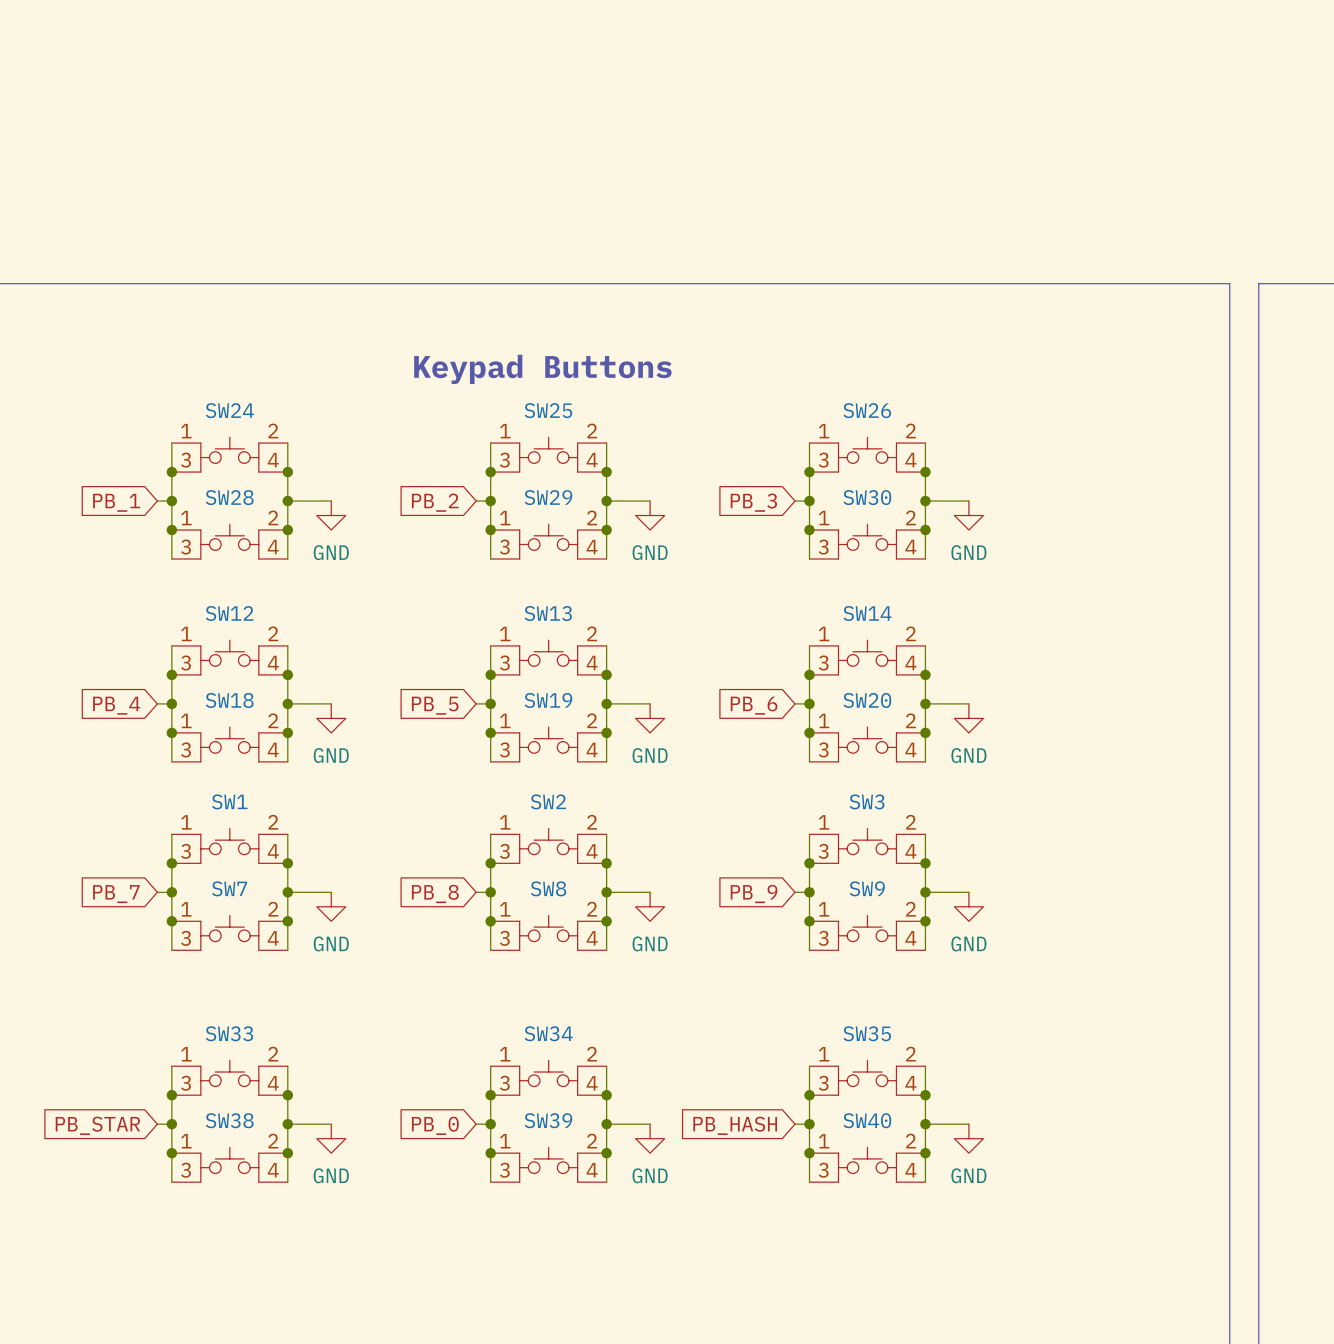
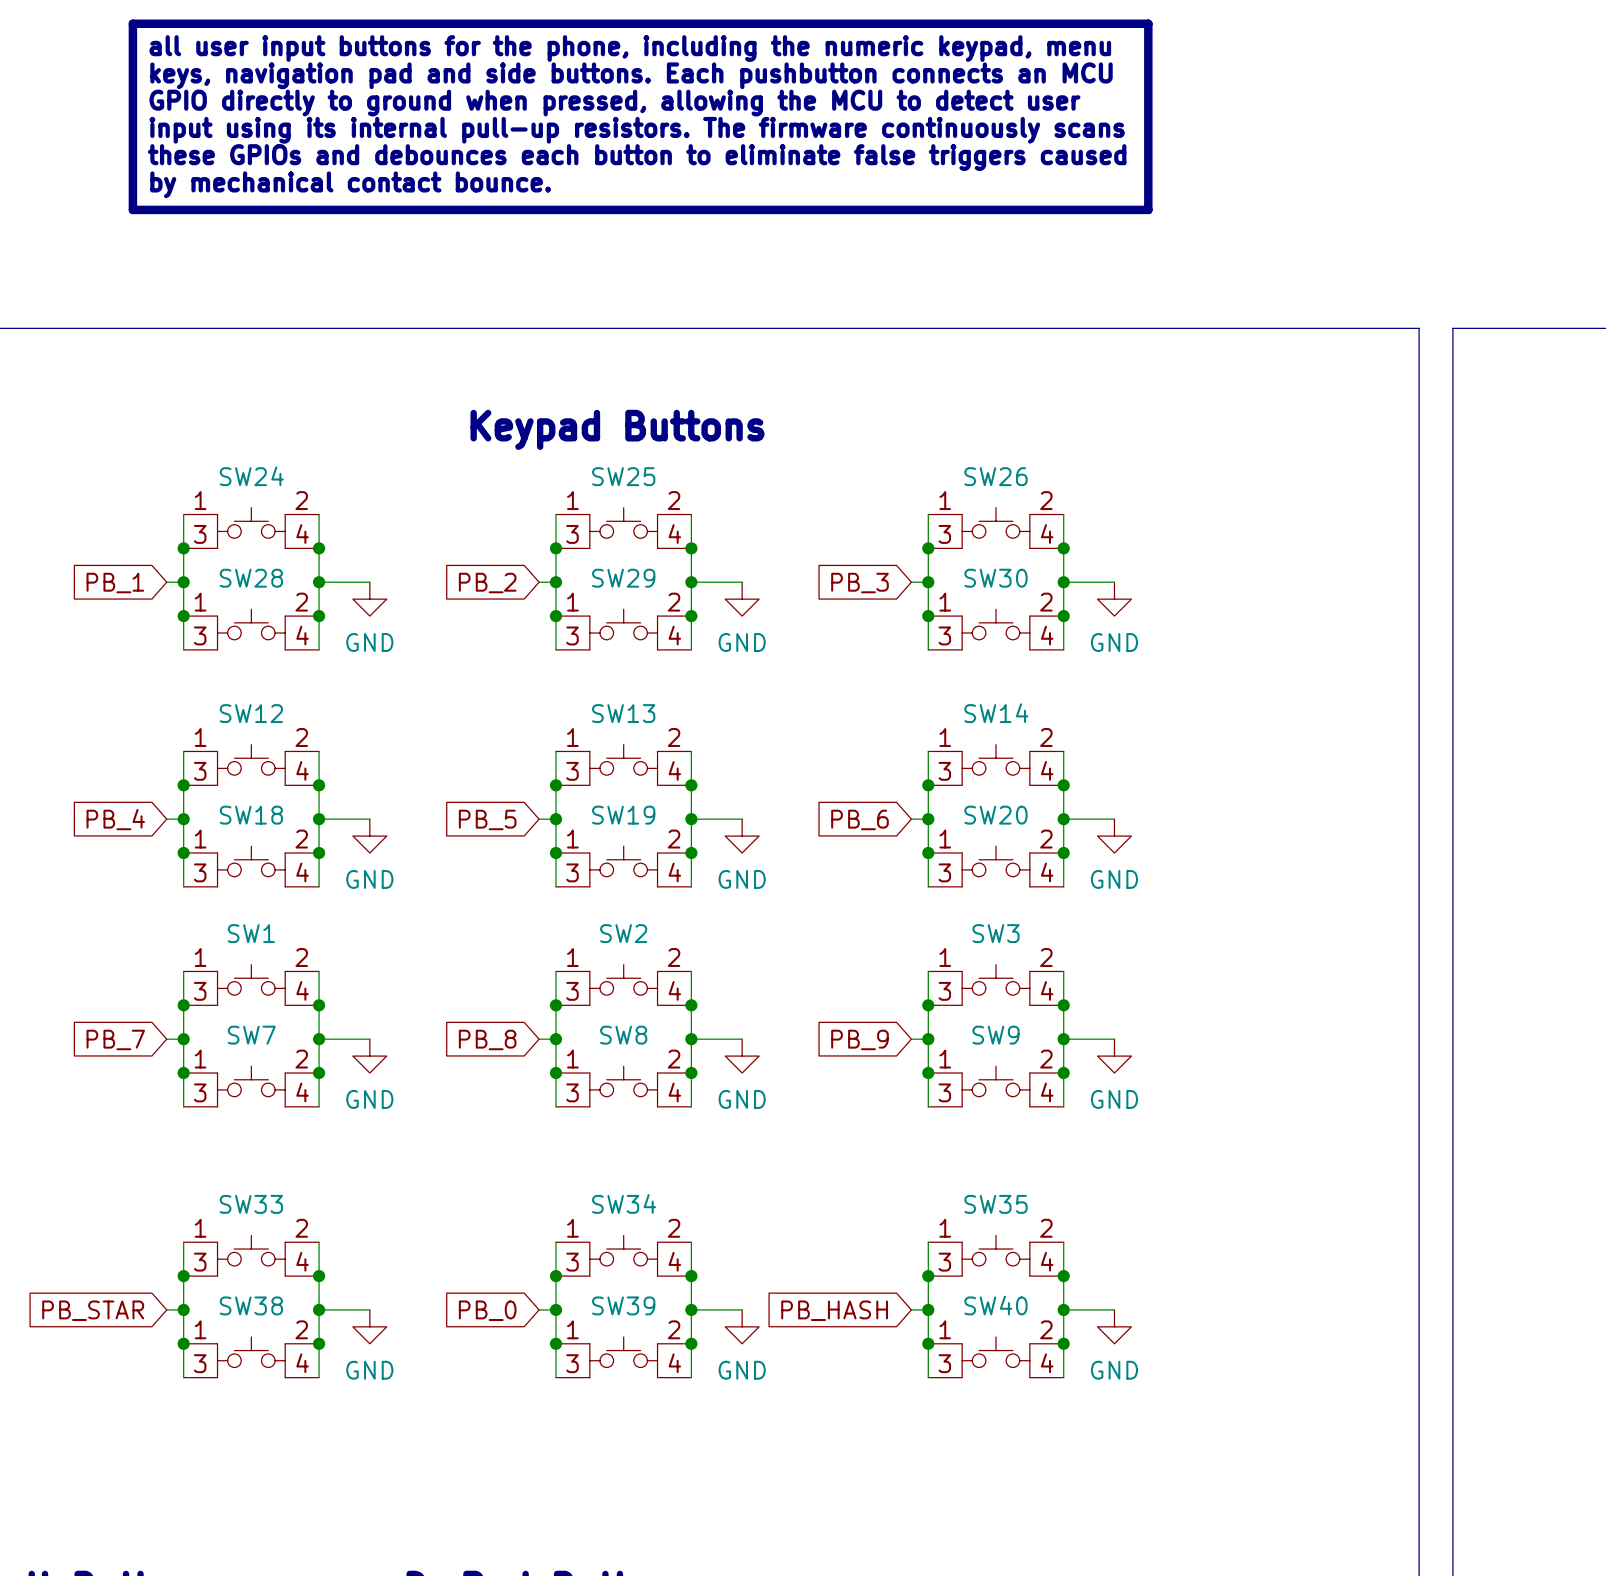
line: none -> (132, 23) (1148, 23) (1148, 209) (132, 209) (132, 23)
text: none -> all user input buttons for the phone, including the numeric keypad, menu (630, 48)
text: none -> keys, navigation pad and side buttons. Each pushbutton connects an MCU (631, 75)
text: none -> GPIO directly to ground when pressed, allowing the MCU to detect user (614, 103)
text: none -> input using its internal pull-up resistors. The firmware continuously scans (637, 130)
text: none -> these GPIOs and debounces each button to eliminate false triggers caused (637, 157)
text: none -> by mechanical contact bounce. (350, 184)

